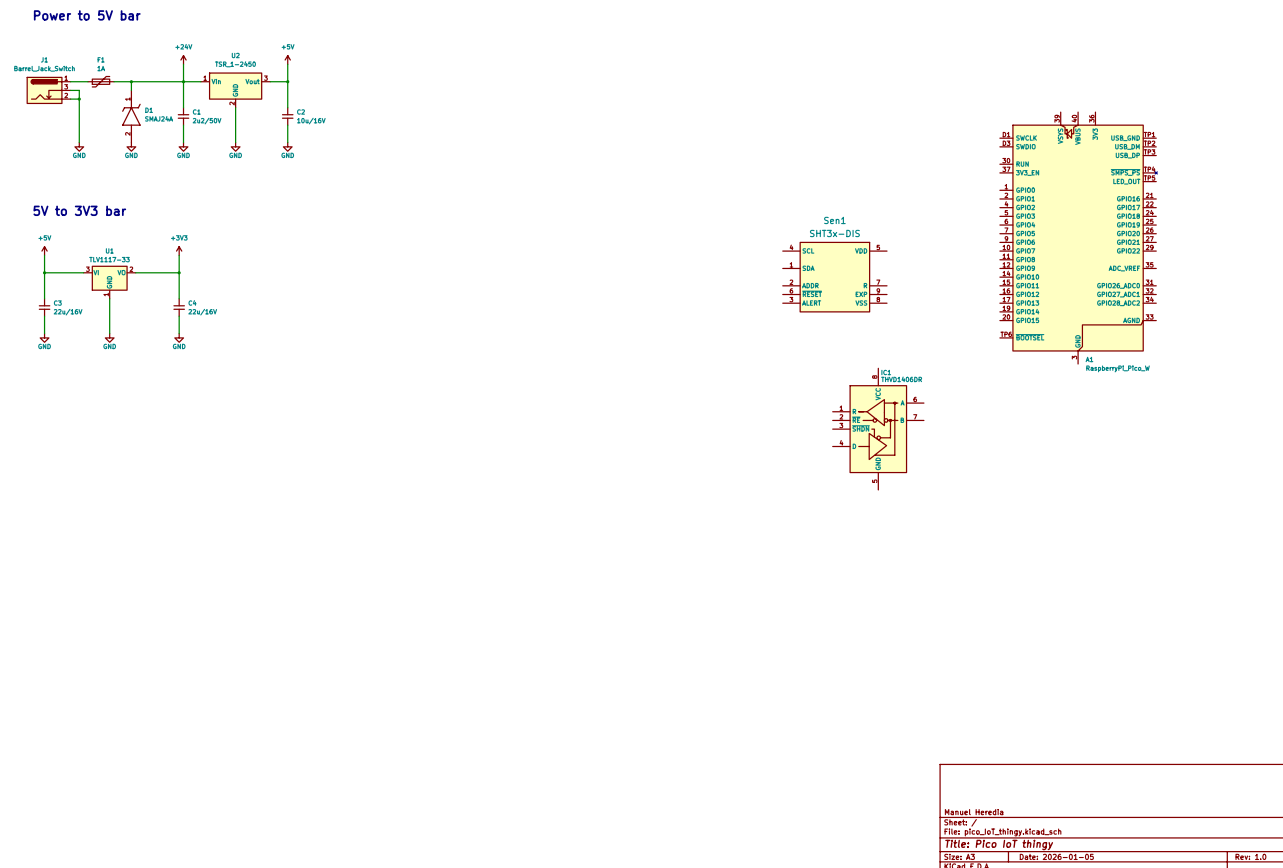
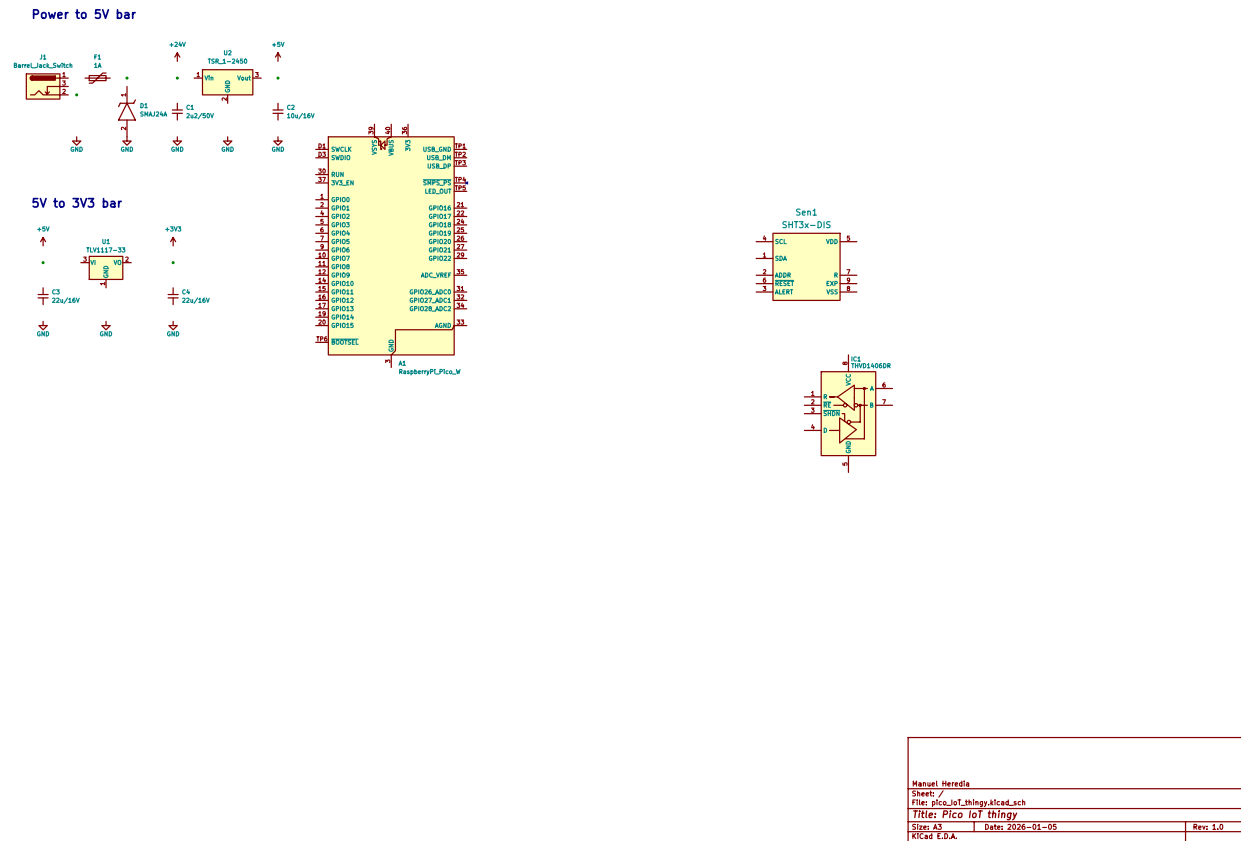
wire: (183, 64) (183, 107) -> none
wire: (287, 64) (287, 107) -> none
wire: (70, 81) (87, 81) -> none
wire: (114, 81) (200, 81) -> none
wire: (131, 81) (131, 90) -> none
wire: (270, 81) (287, 81) -> none
wire: (70, 90) (79, 90) (79, 142) -> none
wire: (70, 99) (79, 99) -> none
wire: (235, 107) (235, 142) -> none
wire: (183, 125) (183, 142) -> none
wire: (287, 125) (287, 142) -> none
part position: (1078, 238) -> (391, 245)
wire: (44, 255) (44, 298) -> none
wire: (179, 255) (179, 298) -> none
wire: (44, 272) (83, 272) -> none
wire: (135, 272) (179, 272) -> none
wire: (109, 298) (109, 333) -> none
wire: (44, 316) (44, 333) -> none
wire: (179, 316) (179, 333) -> none

